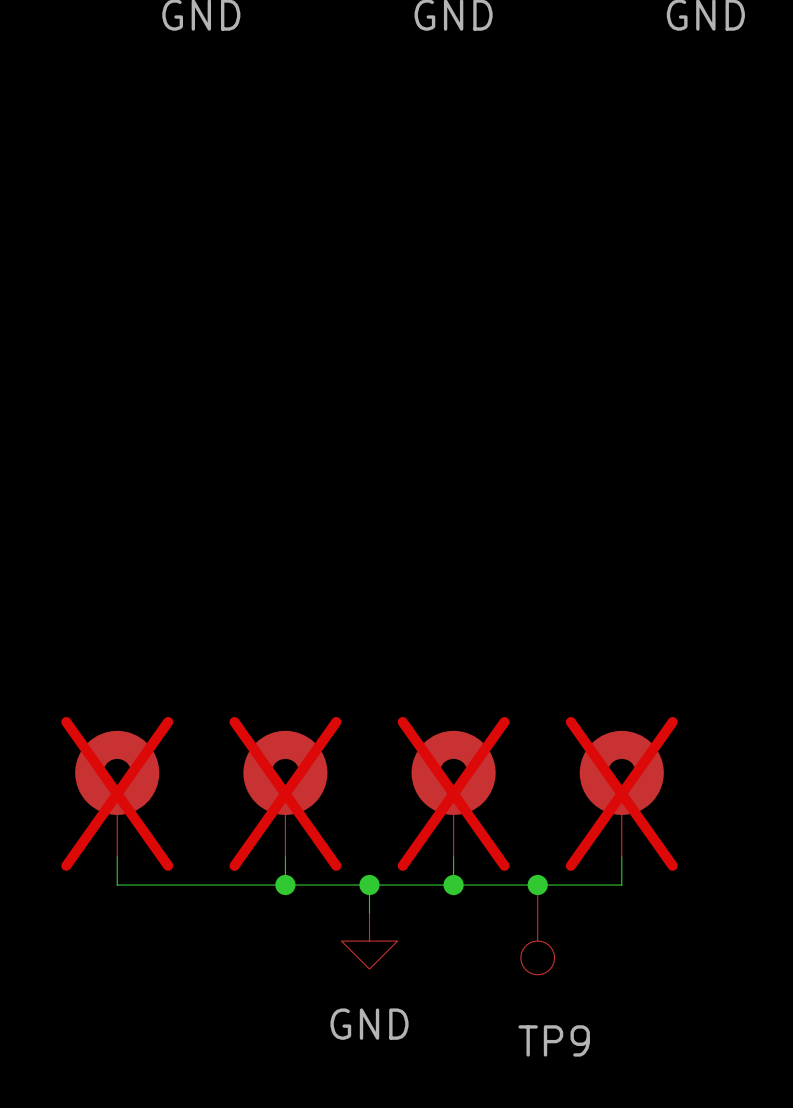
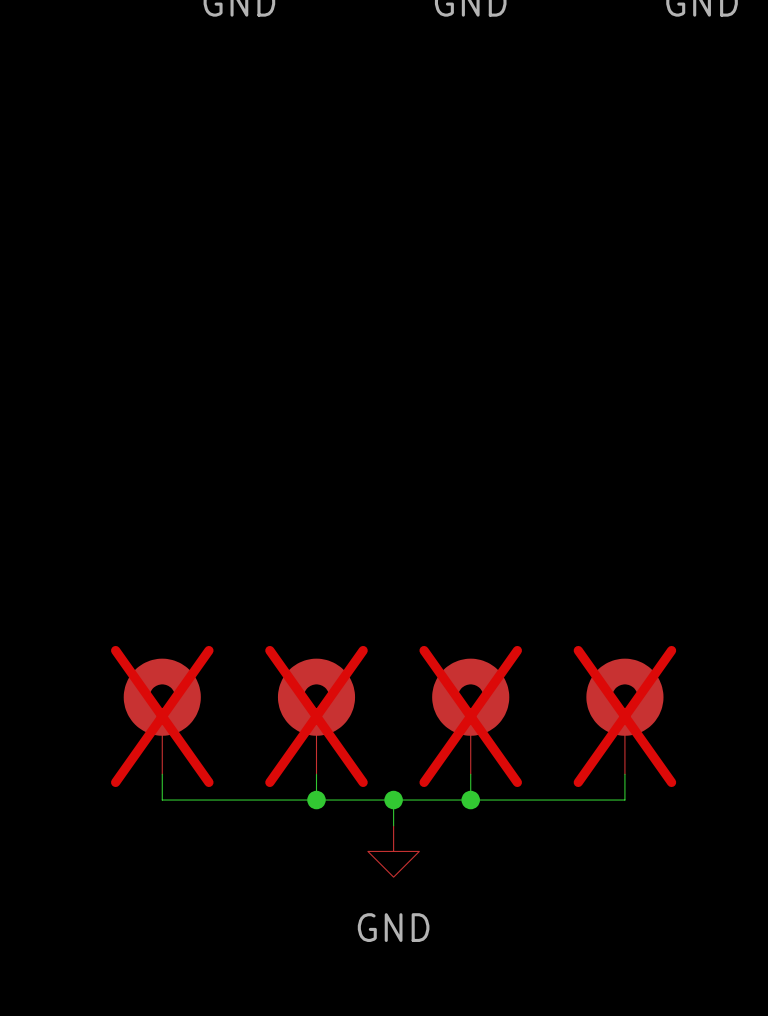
junction: (537, 885) -> none
TP9: (537, 929) -> none

